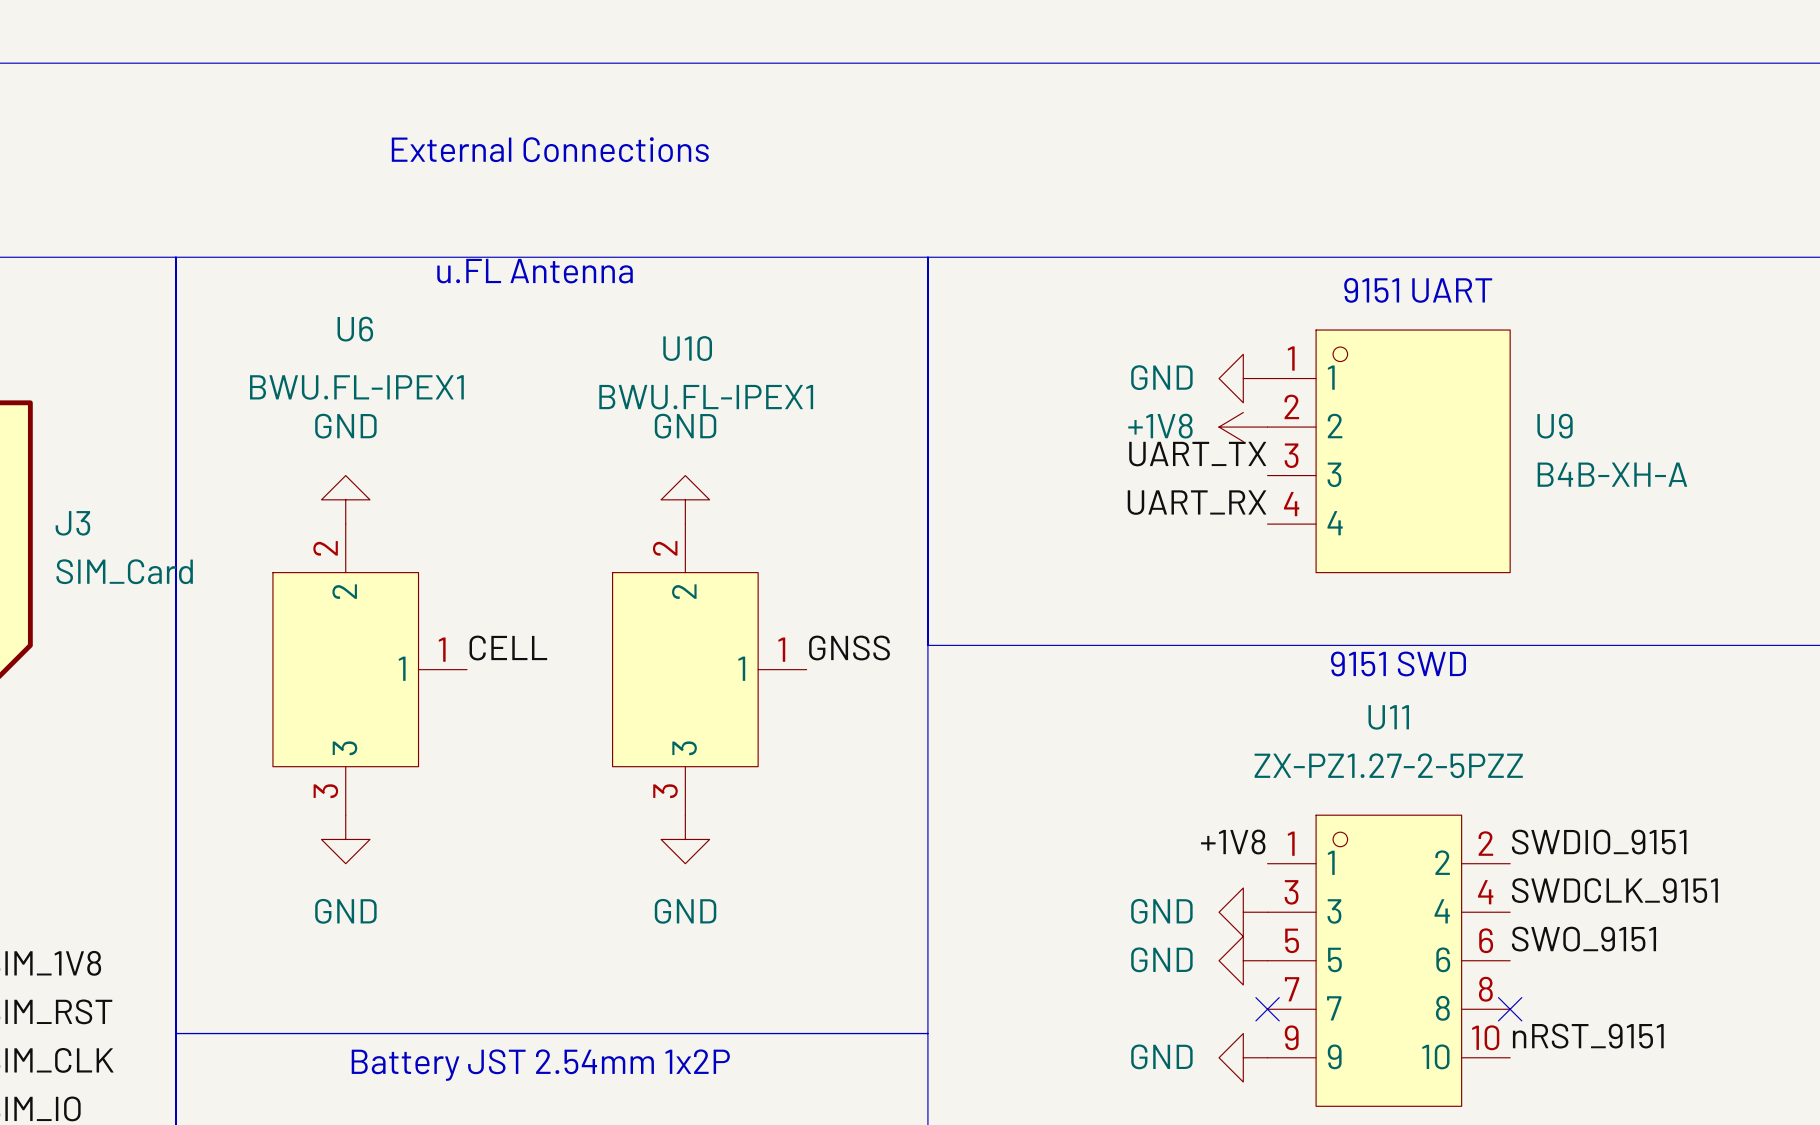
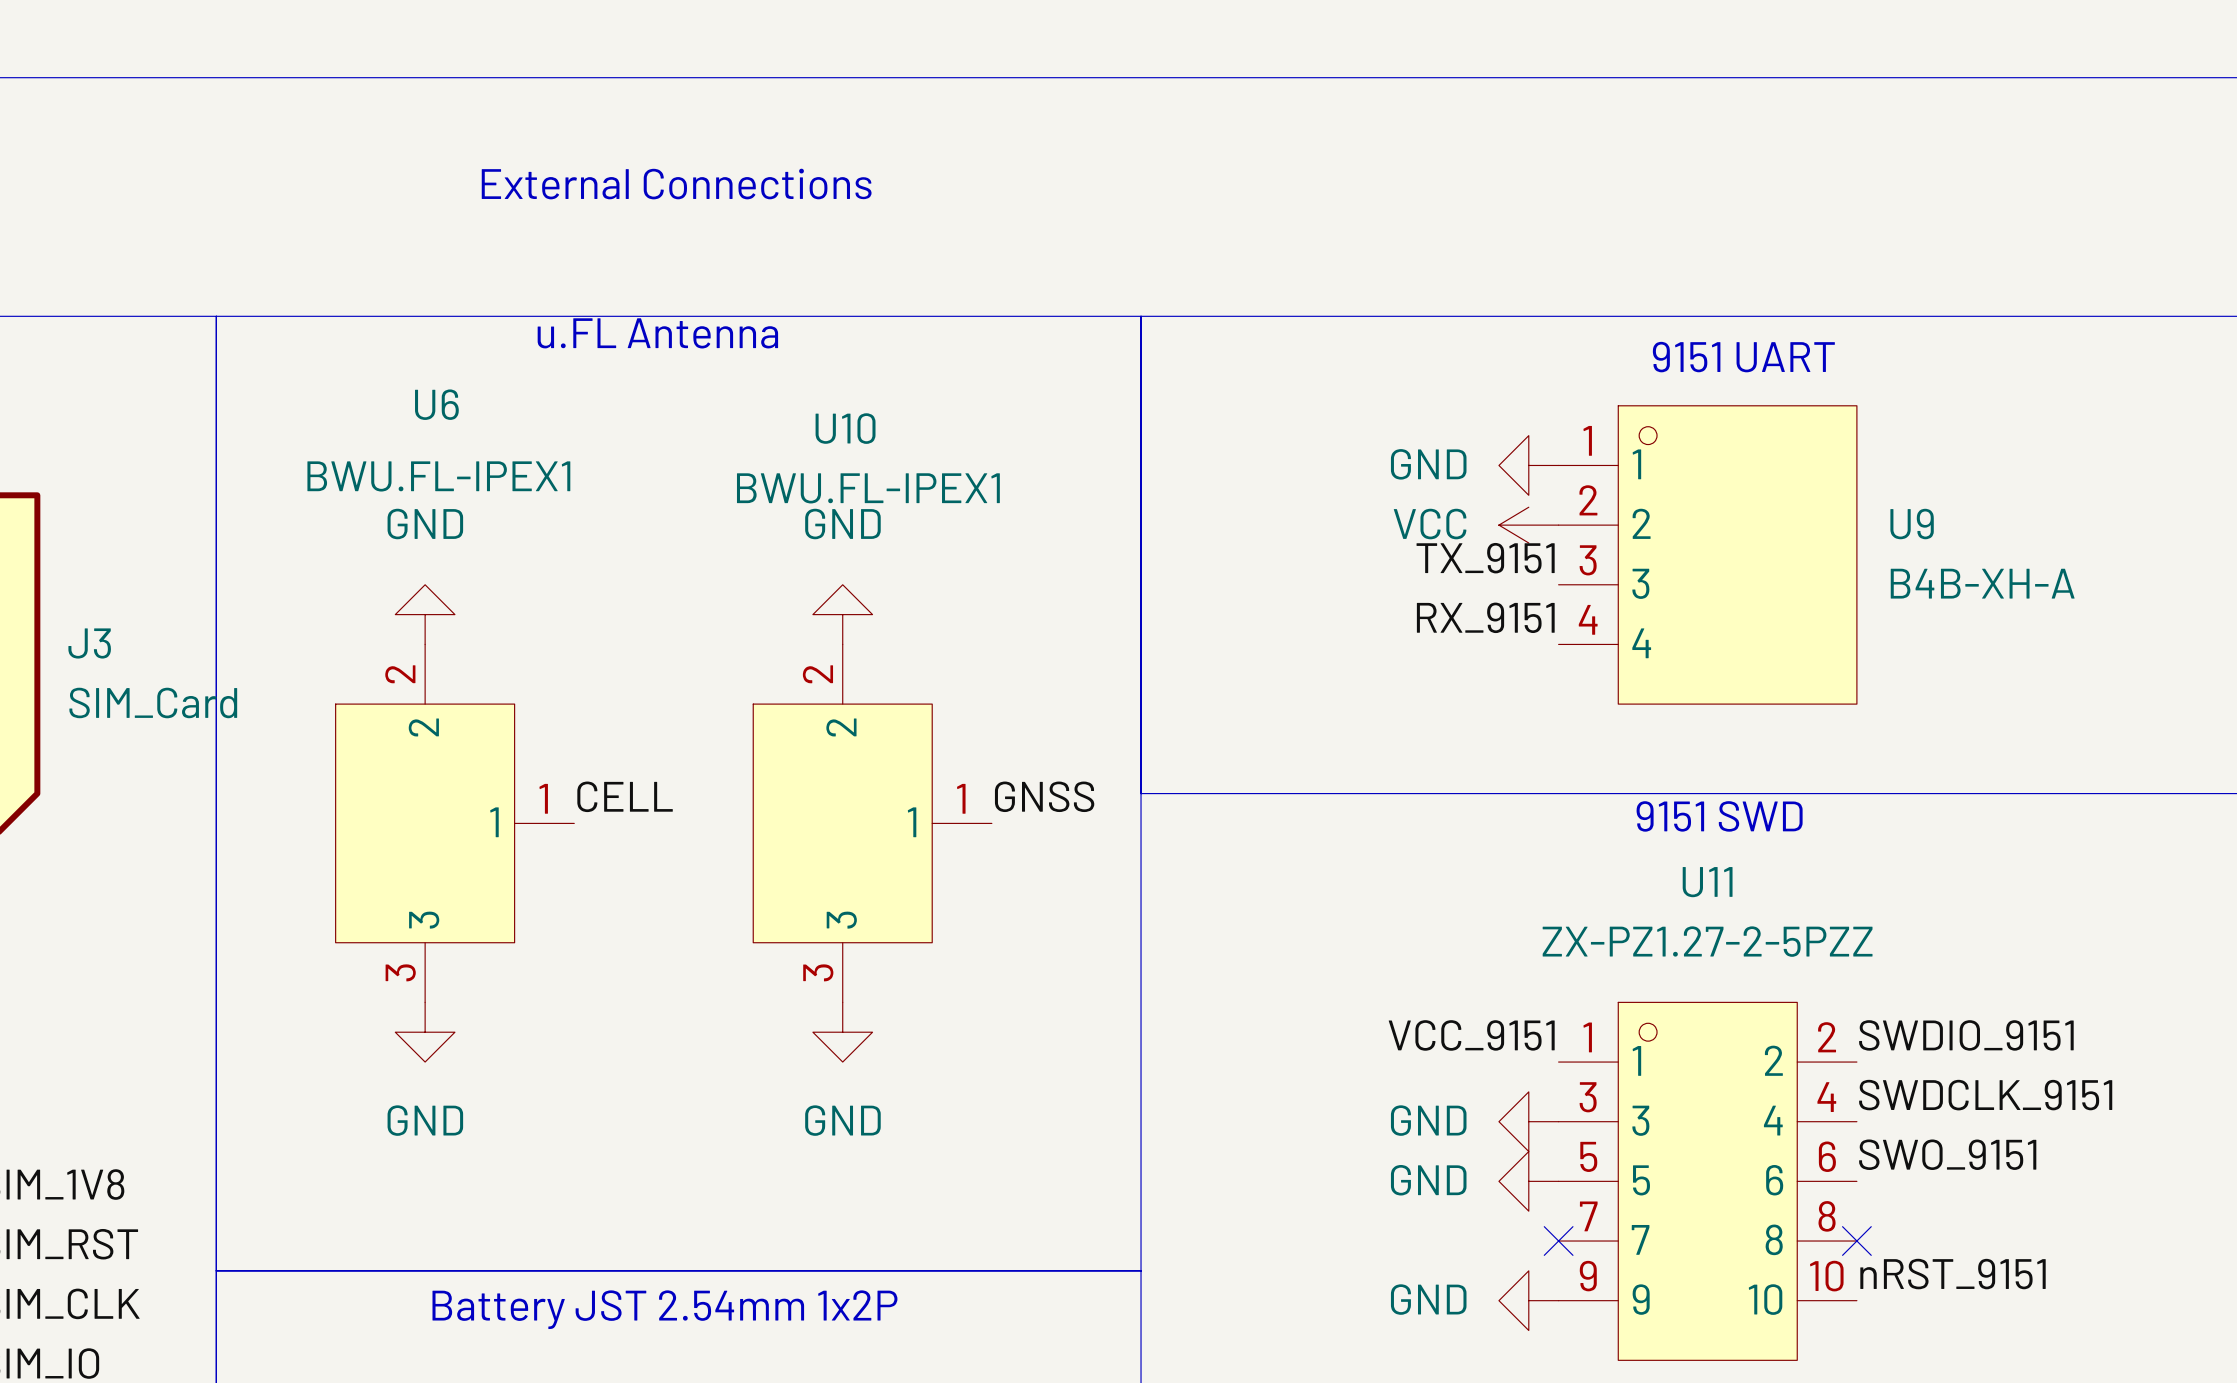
power symbol: +1V8 (1243, 427) -> VCC (1528, 525)
label: UART_TX (1197, 454) -> TX_9151 (1485, 558)
label: UART_RX (1196, 502) -> RX_9151 (1485, 617)
label: +1V8 (1233, 842) -> VCC_9151 (1471, 1035)

